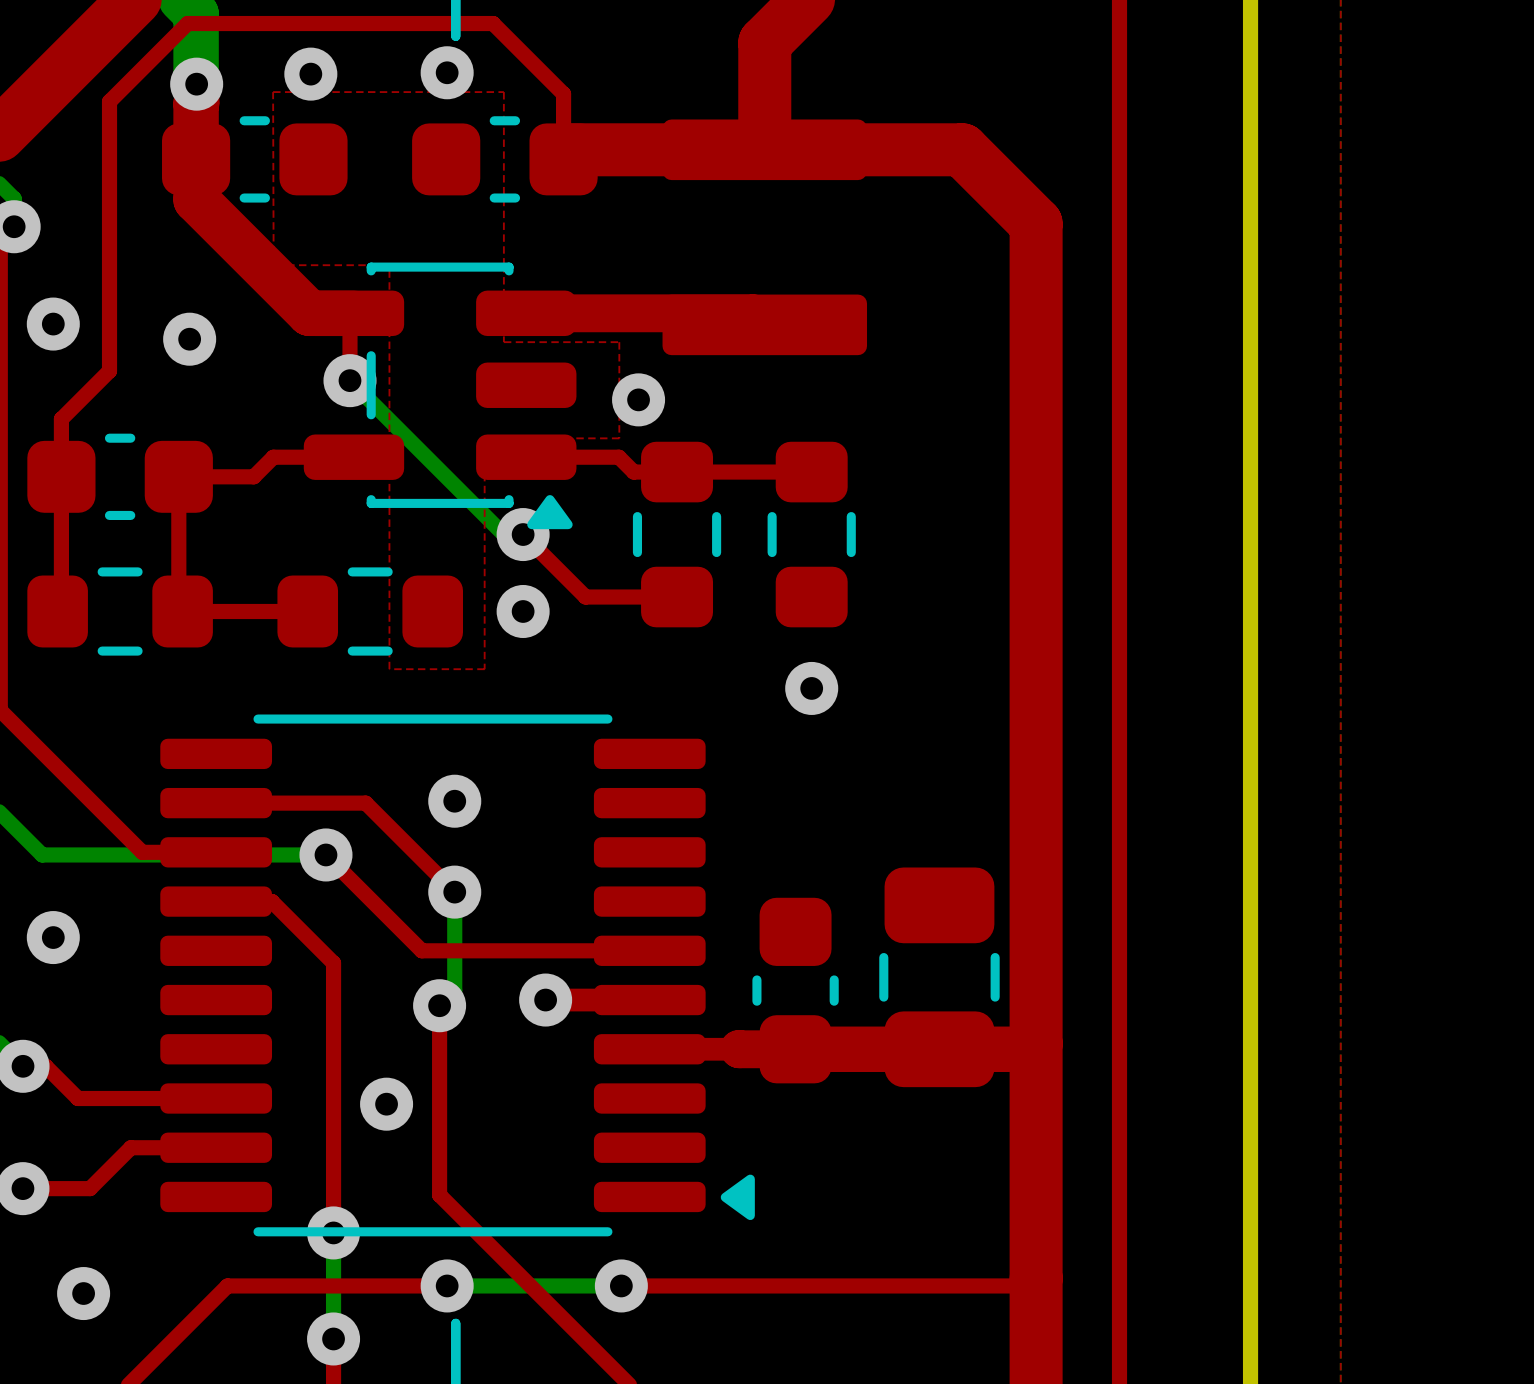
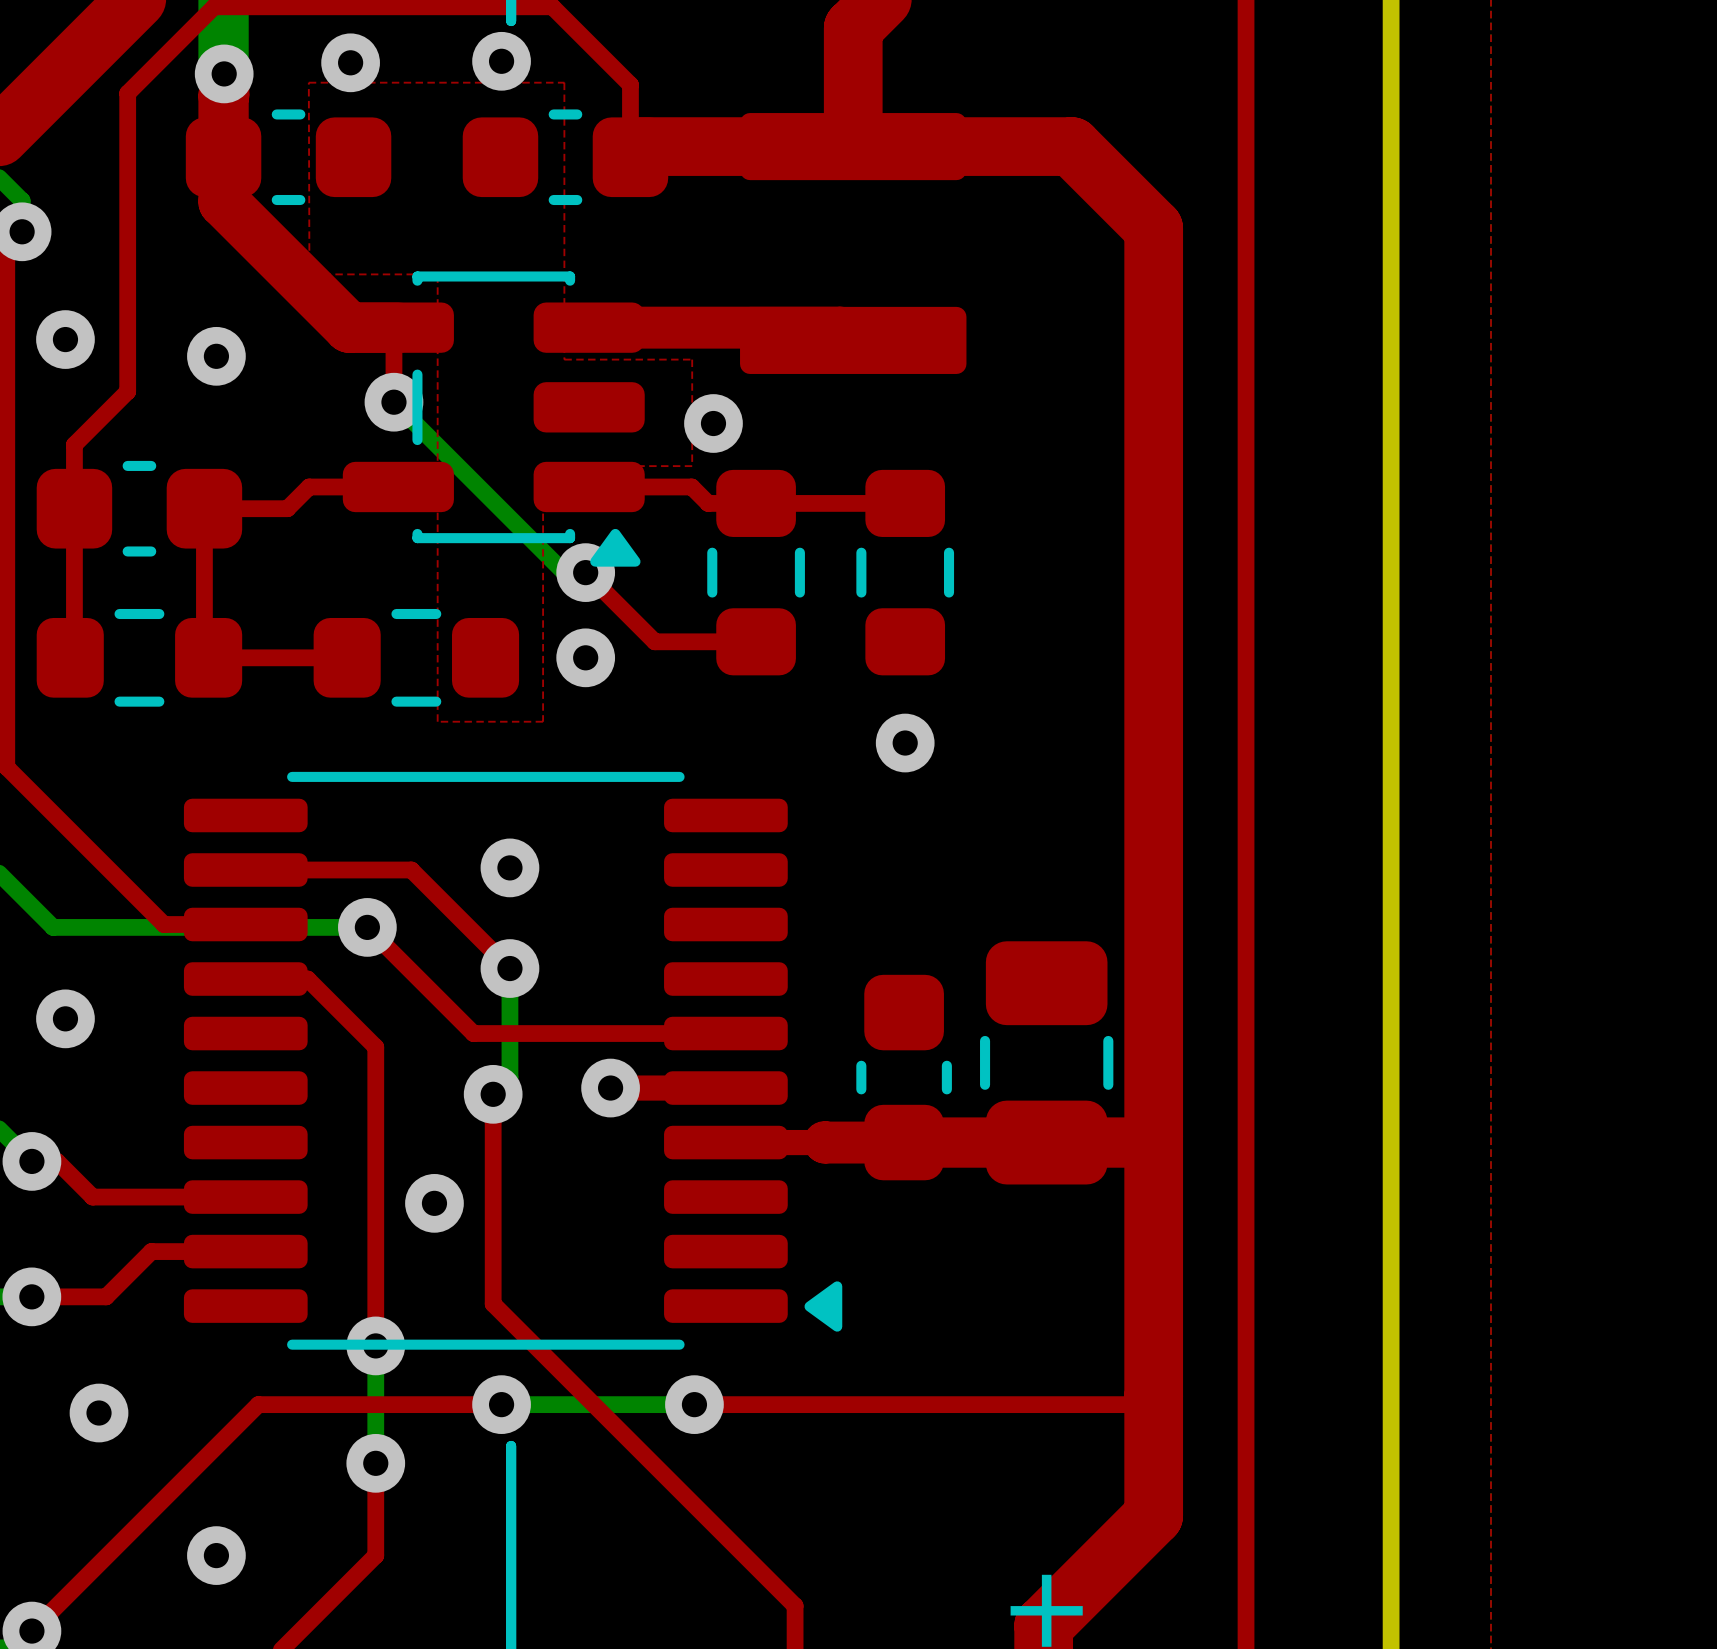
part position: (795, 990) -> (904, 1077)

